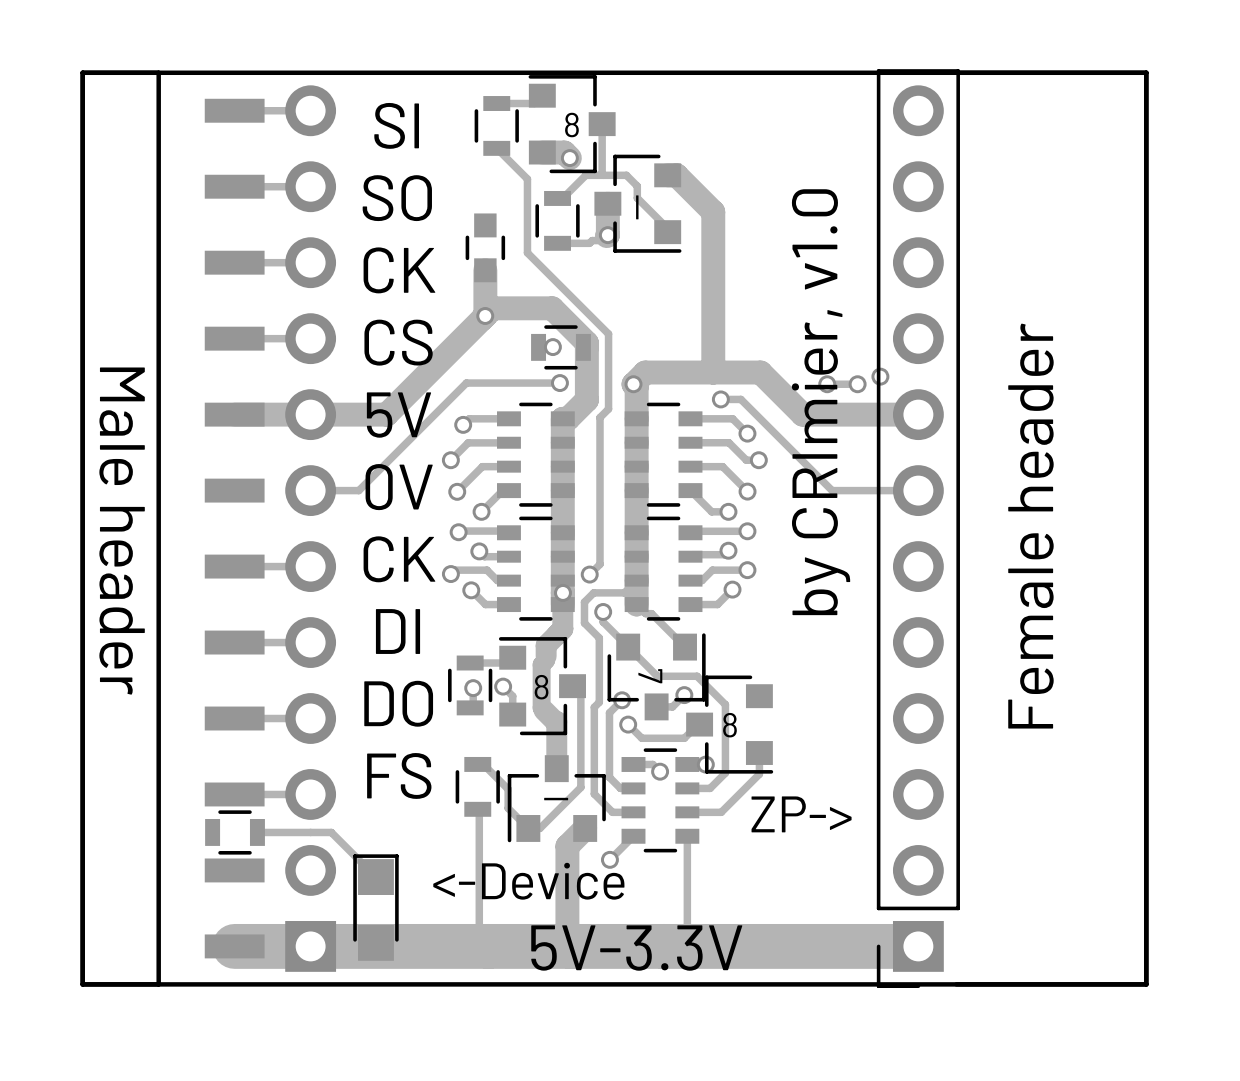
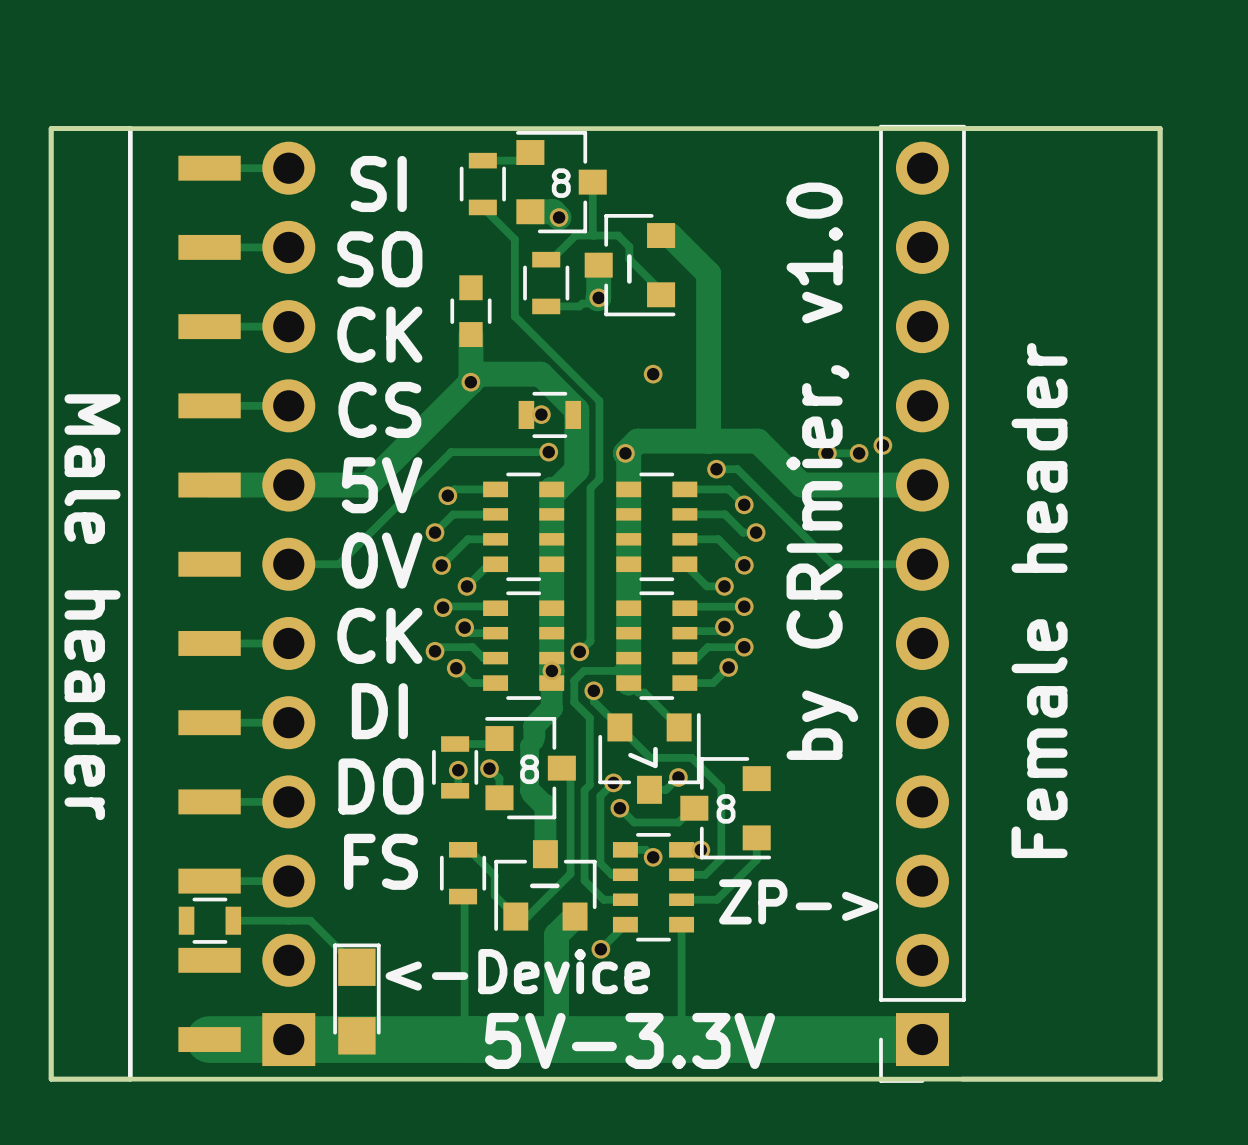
via: none -> (653, 374)

